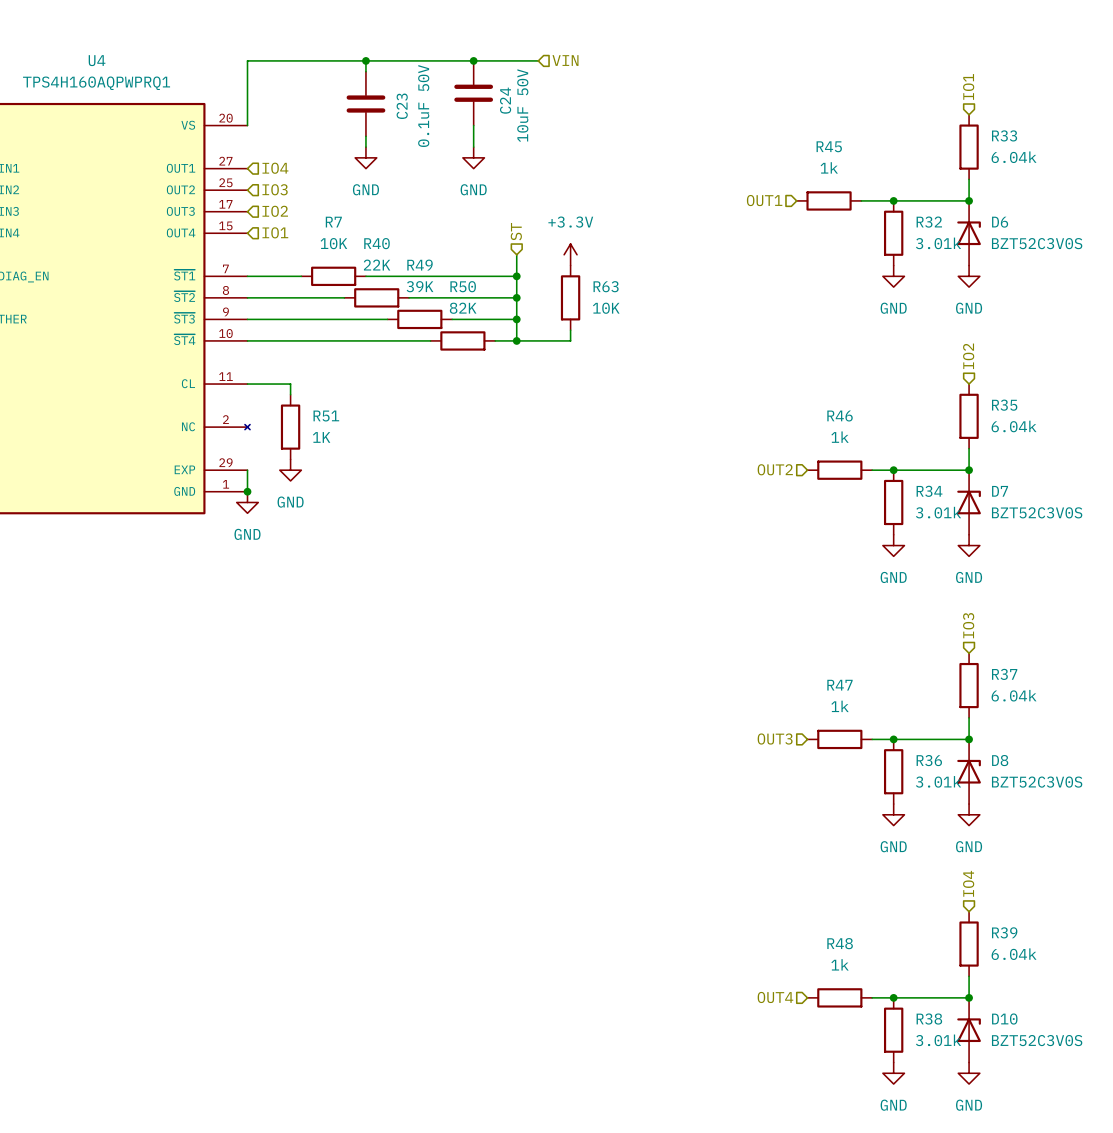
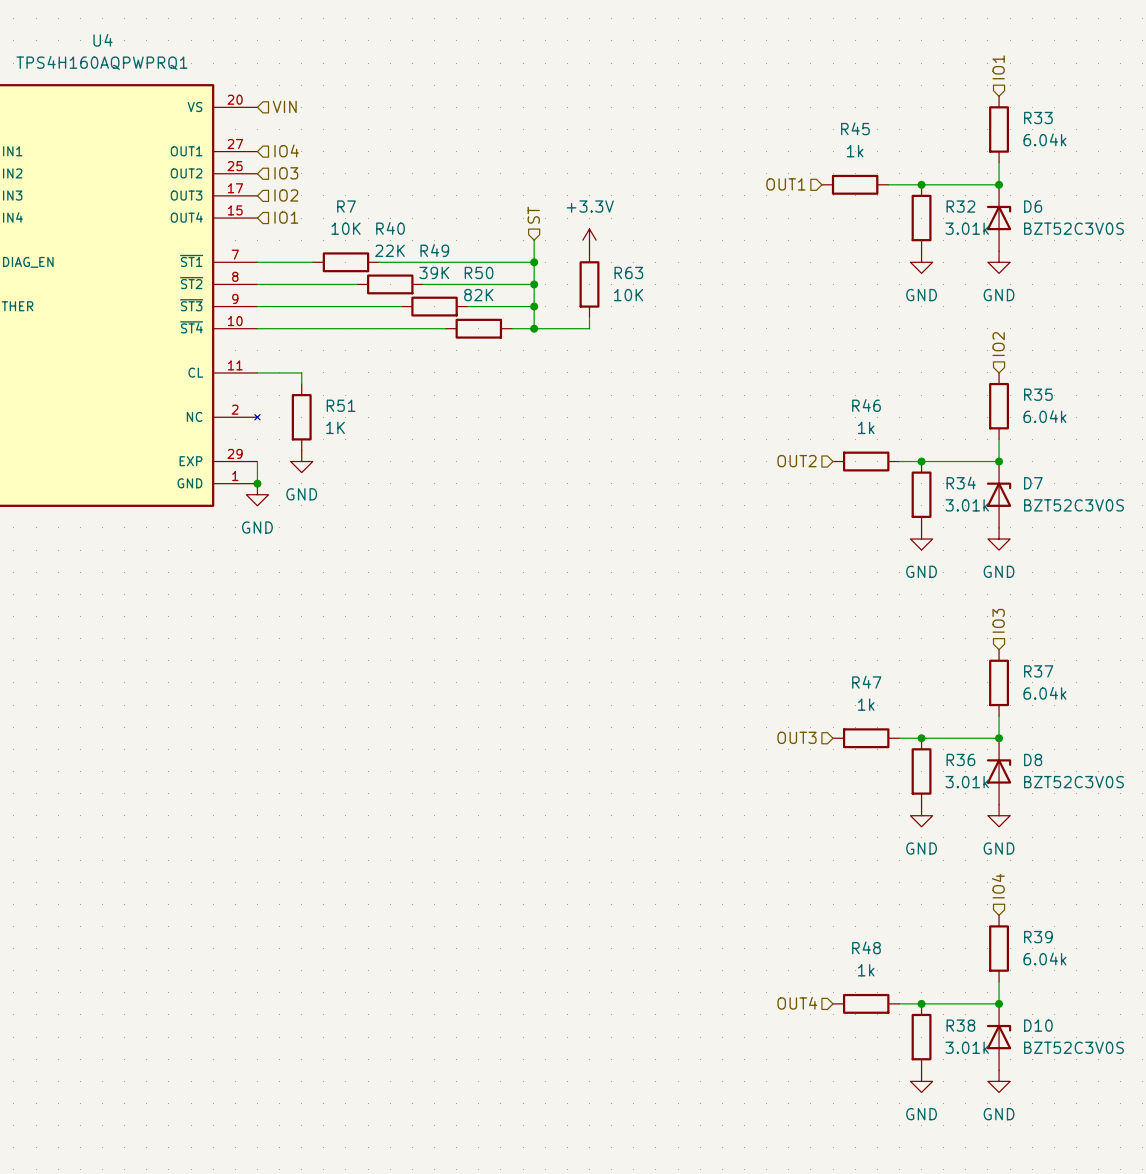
wire: (365, 60) (365, 71) -> none
junction: (365, 60) -> none
junction: (473, 60) -> none
wire: (538, 60) (247, 60) (247, 125) -> none
hierarchical label: VIN (565, 60) -> none
C24: 10uF 50V (473, 93) -> none
C23: 0.1uF 50V (365, 104) -> none
hierarchical label: none -> VIN (284, 106)
wire: (473, 125) (473, 147) -> none
wire: (365, 136) (365, 147) -> none
power symbol: GND (365, 157) -> none
power symbol: GND (473, 157) -> none

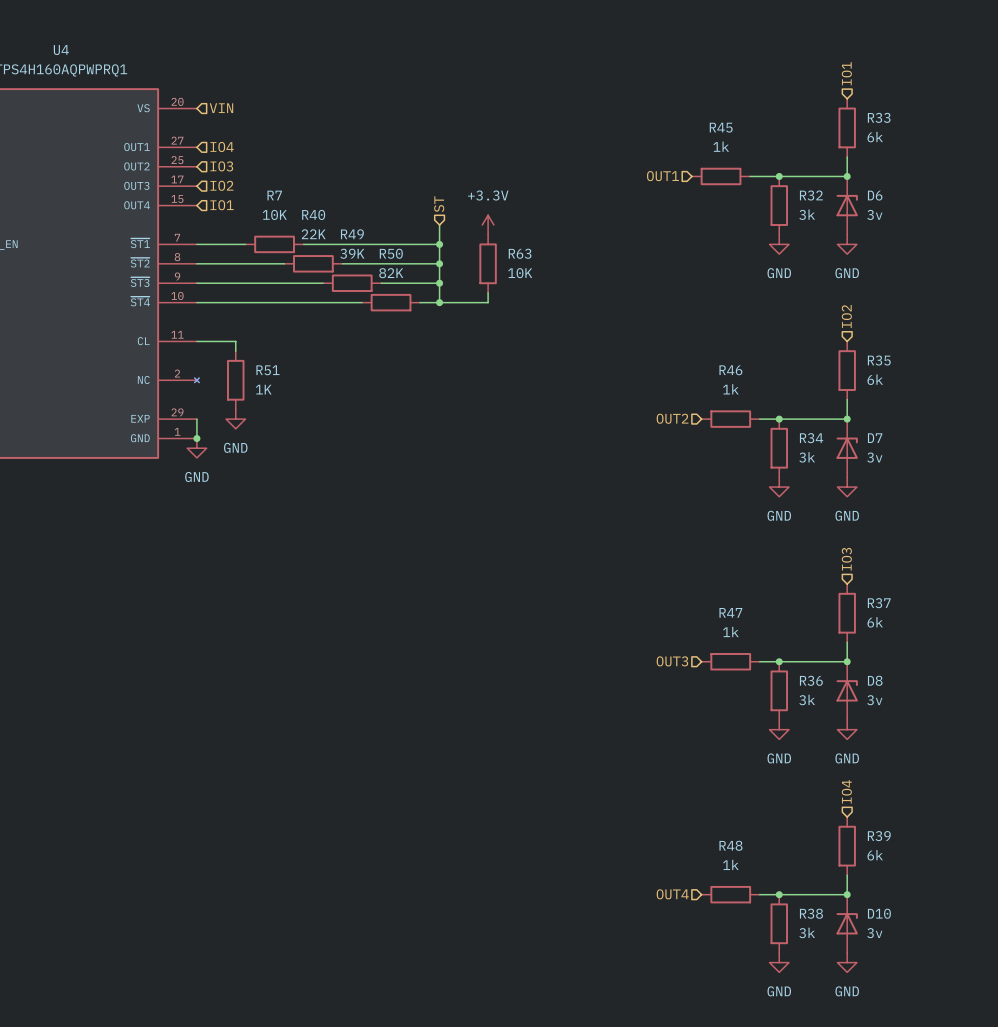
R33 value: 6.04k (1044, 139) -> 6k (875, 137)
R32 value: 3.01k (967, 228) -> 3k (807, 214)
D6 value: BZT52C3V0S (1073, 228) -> 3v (874, 214)
R35 value: 6.04k (1044, 416) -> 6k (875, 379)
R34 value: 3.01k (967, 505) -> 3k (807, 457)
D7 value: BZT52C3V0S (1073, 505) -> 3v (874, 457)
R37 value: 6.04k (1044, 693) -> 6k (875, 622)
R36 value: 3.01k (967, 782) -> 3k (807, 699)
D8 value: BZT52C3V0S (1073, 782) -> 3v (874, 700)
R39 value: 6.04k (1044, 958) -> 6k (875, 855)
R38 value: 3.01k (967, 1047) -> 3k (807, 932)
D10 value: BZT52C3V0S (1073, 1047) -> 3v (874, 933)

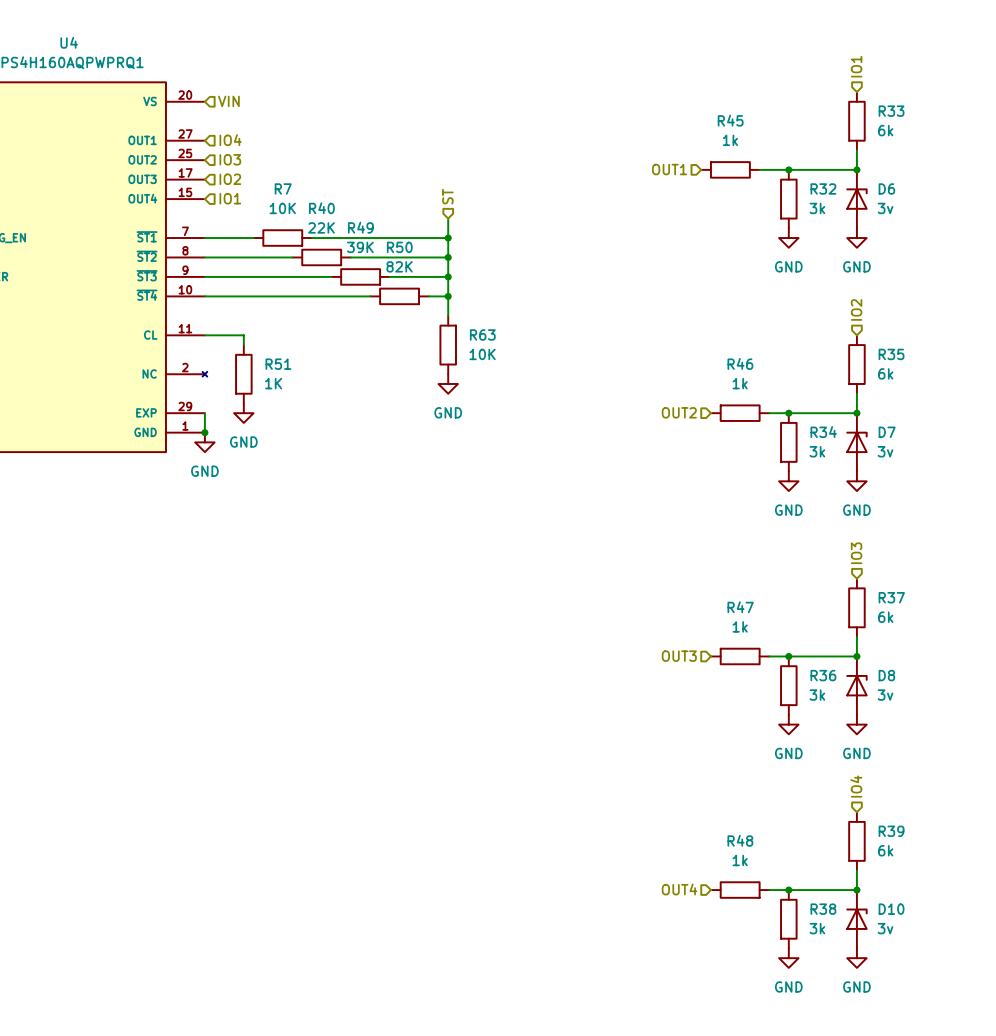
power symbol: +3.3V (488, 224) -> none
R63 position: (488, 263) -> (448, 345)
wire: (488, 292) (488, 302) (439, 302) -> (448, 315) (448, 296)
power symbol: none -> GND (448, 383)

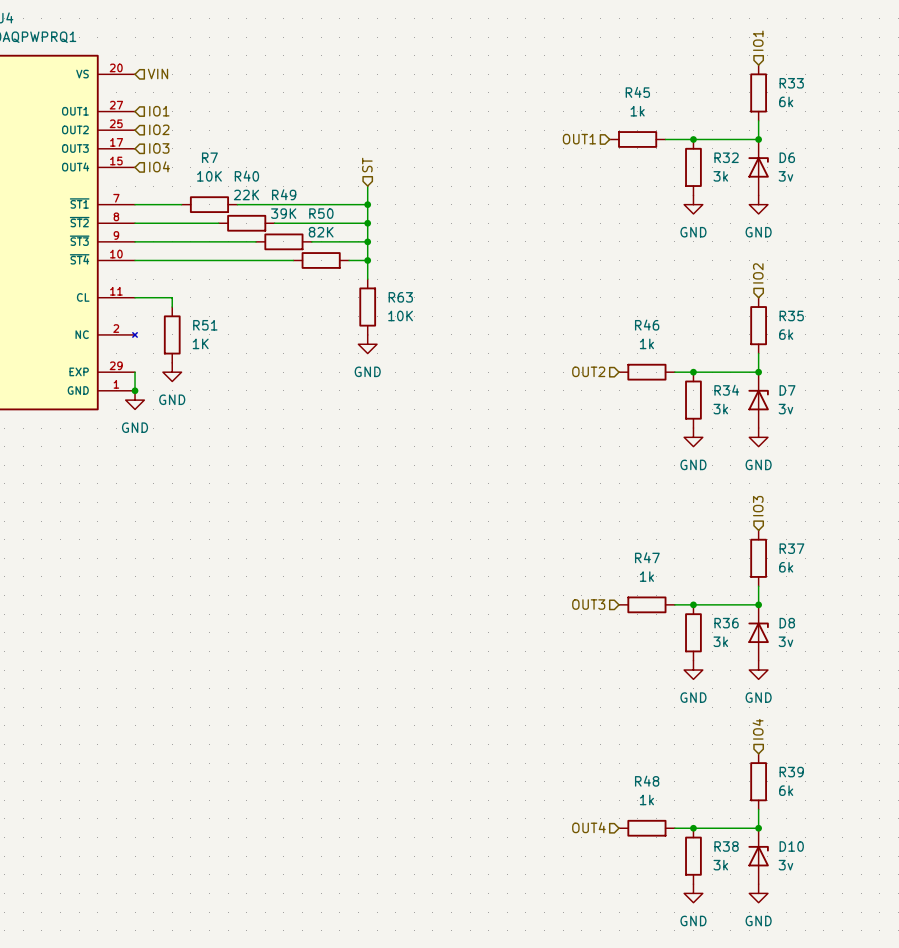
hierarchical label: IO4 (230, 140) -> IO1 (159, 111)
hierarchical label: IO3 (230, 159) -> IO2 (159, 129)
hierarchical label: IO2 (230, 179) -> IO3 (159, 148)
hierarchical label: IO1 (230, 198) -> IO4 (159, 166)

